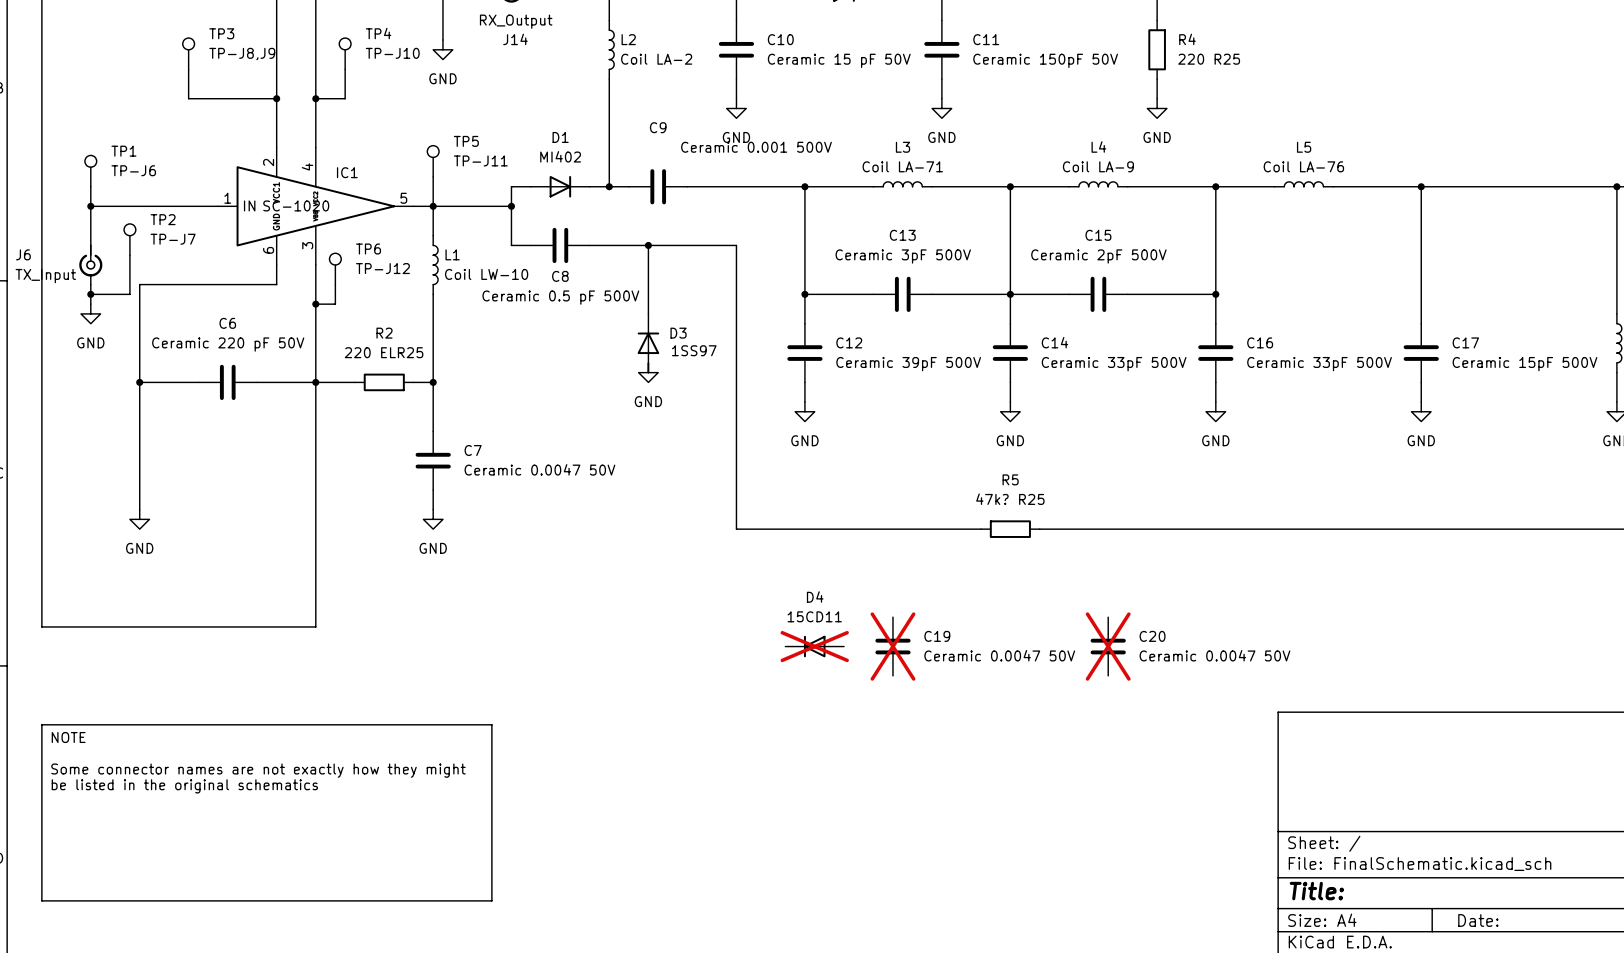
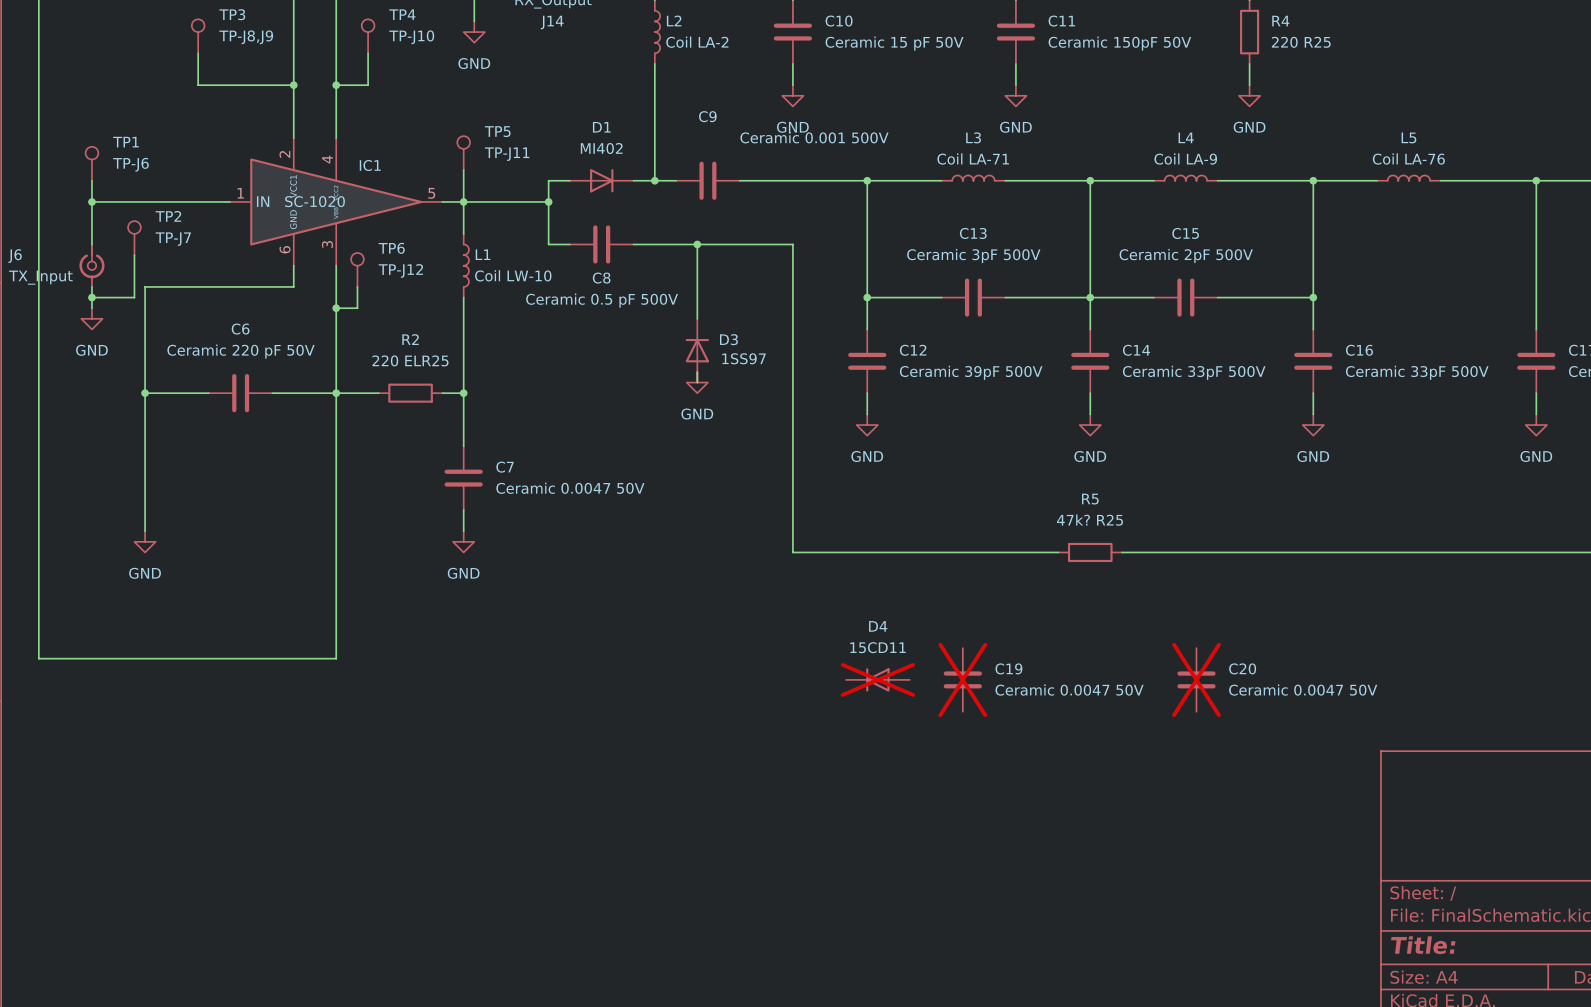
line: (41, 724) (491, 724) (491, 900) (41, 900) (41, 724) -> none
text: NOTE (68, 737) -> none
text: Some connector names are not exactly how they might (258, 770) -> none
text: be listed in the original schematics (184, 786) -> none

